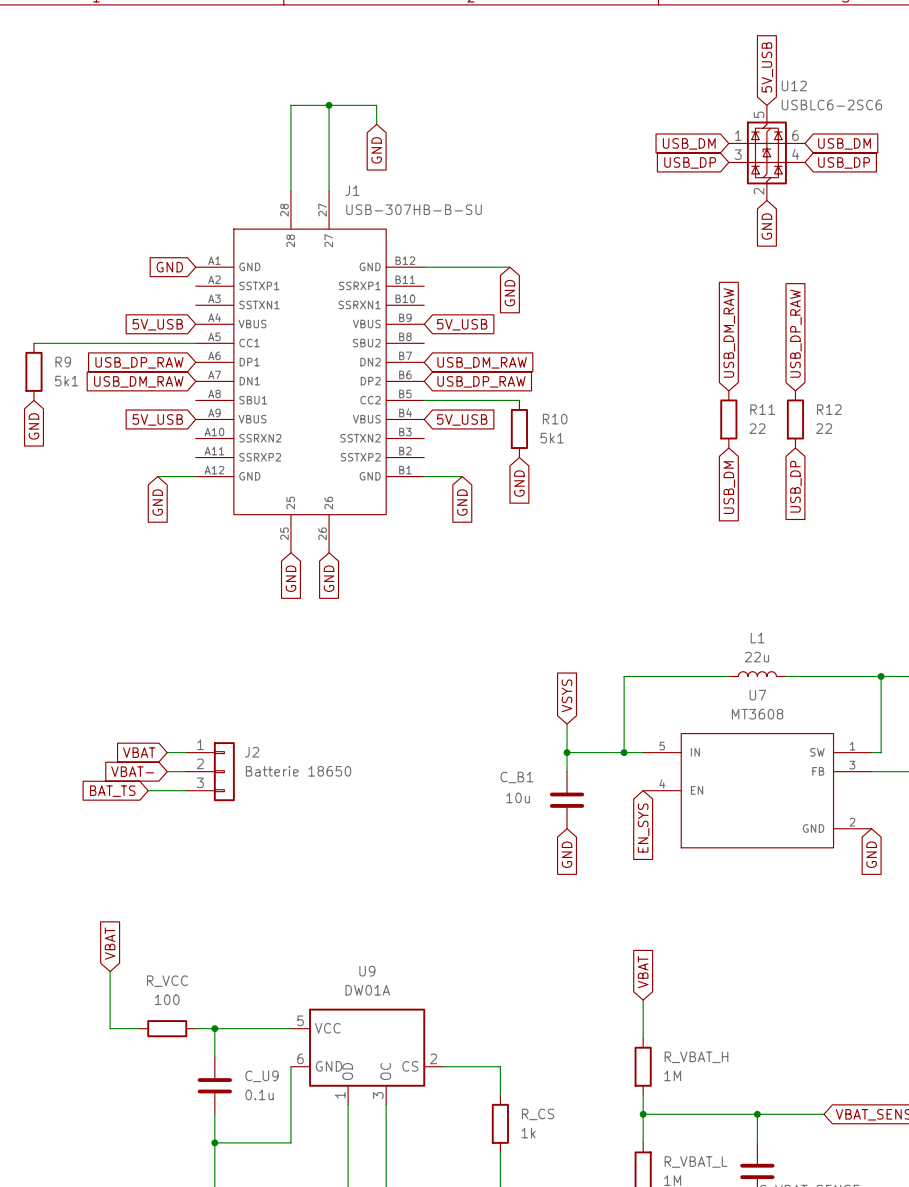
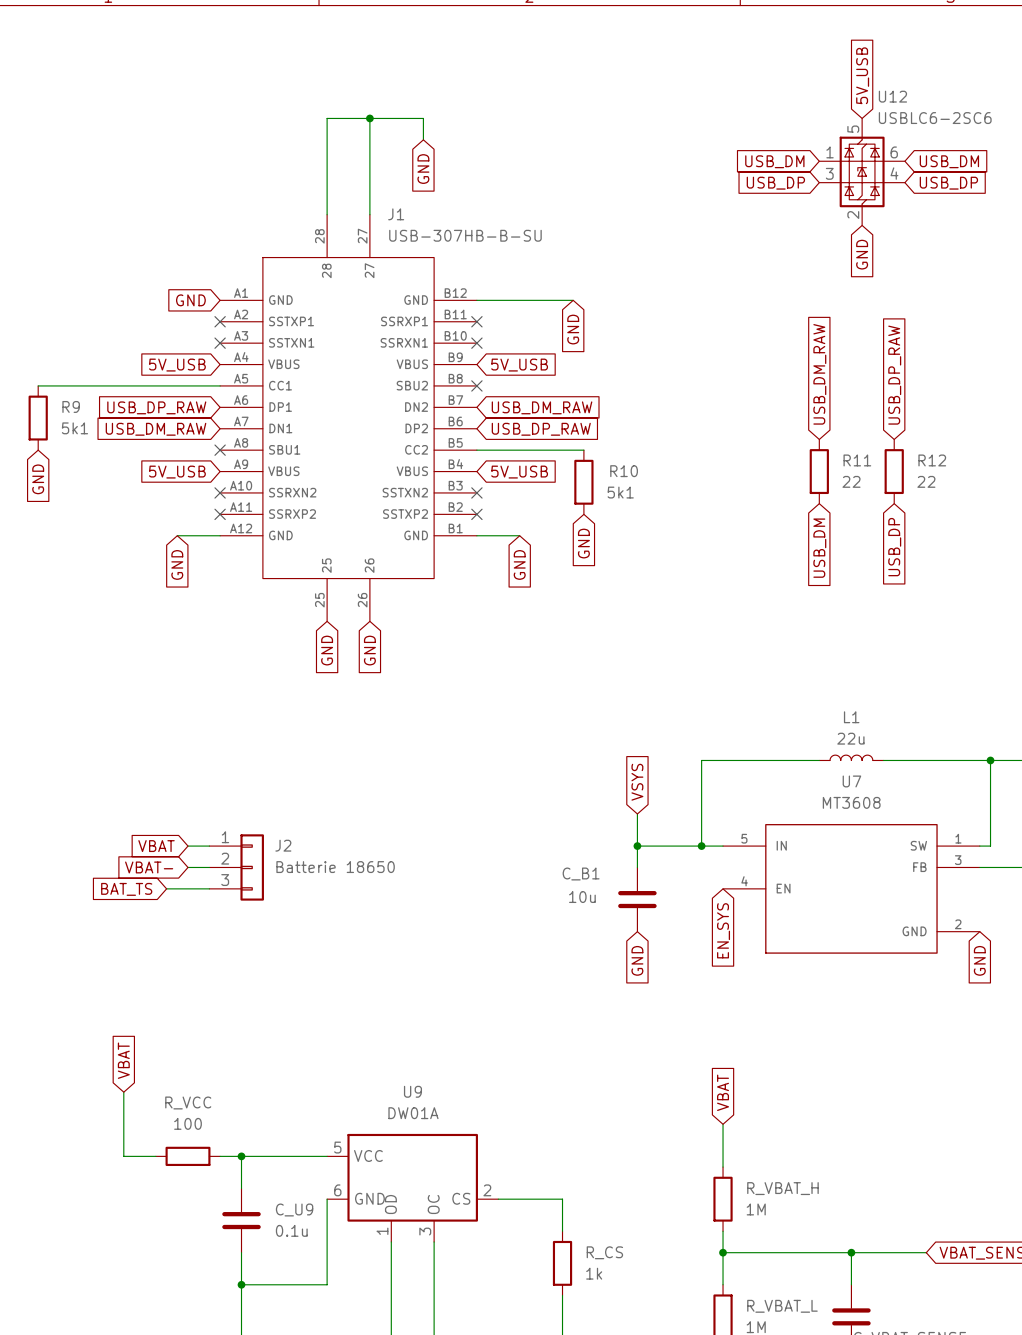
no-connect mark: none -> (220, 321)
no-connect mark: none -> (476, 321)
no-connect mark: none -> (220, 343)
no-connect mark: none -> (476, 343)
no-connect mark: none -> (476, 385)
no-connect mark: none -> (220, 450)
no-connect mark: none -> (220, 492)
no-connect mark: none -> (476, 492)
no-connect mark: none -> (220, 514)
no-connect mark: none -> (476, 514)

